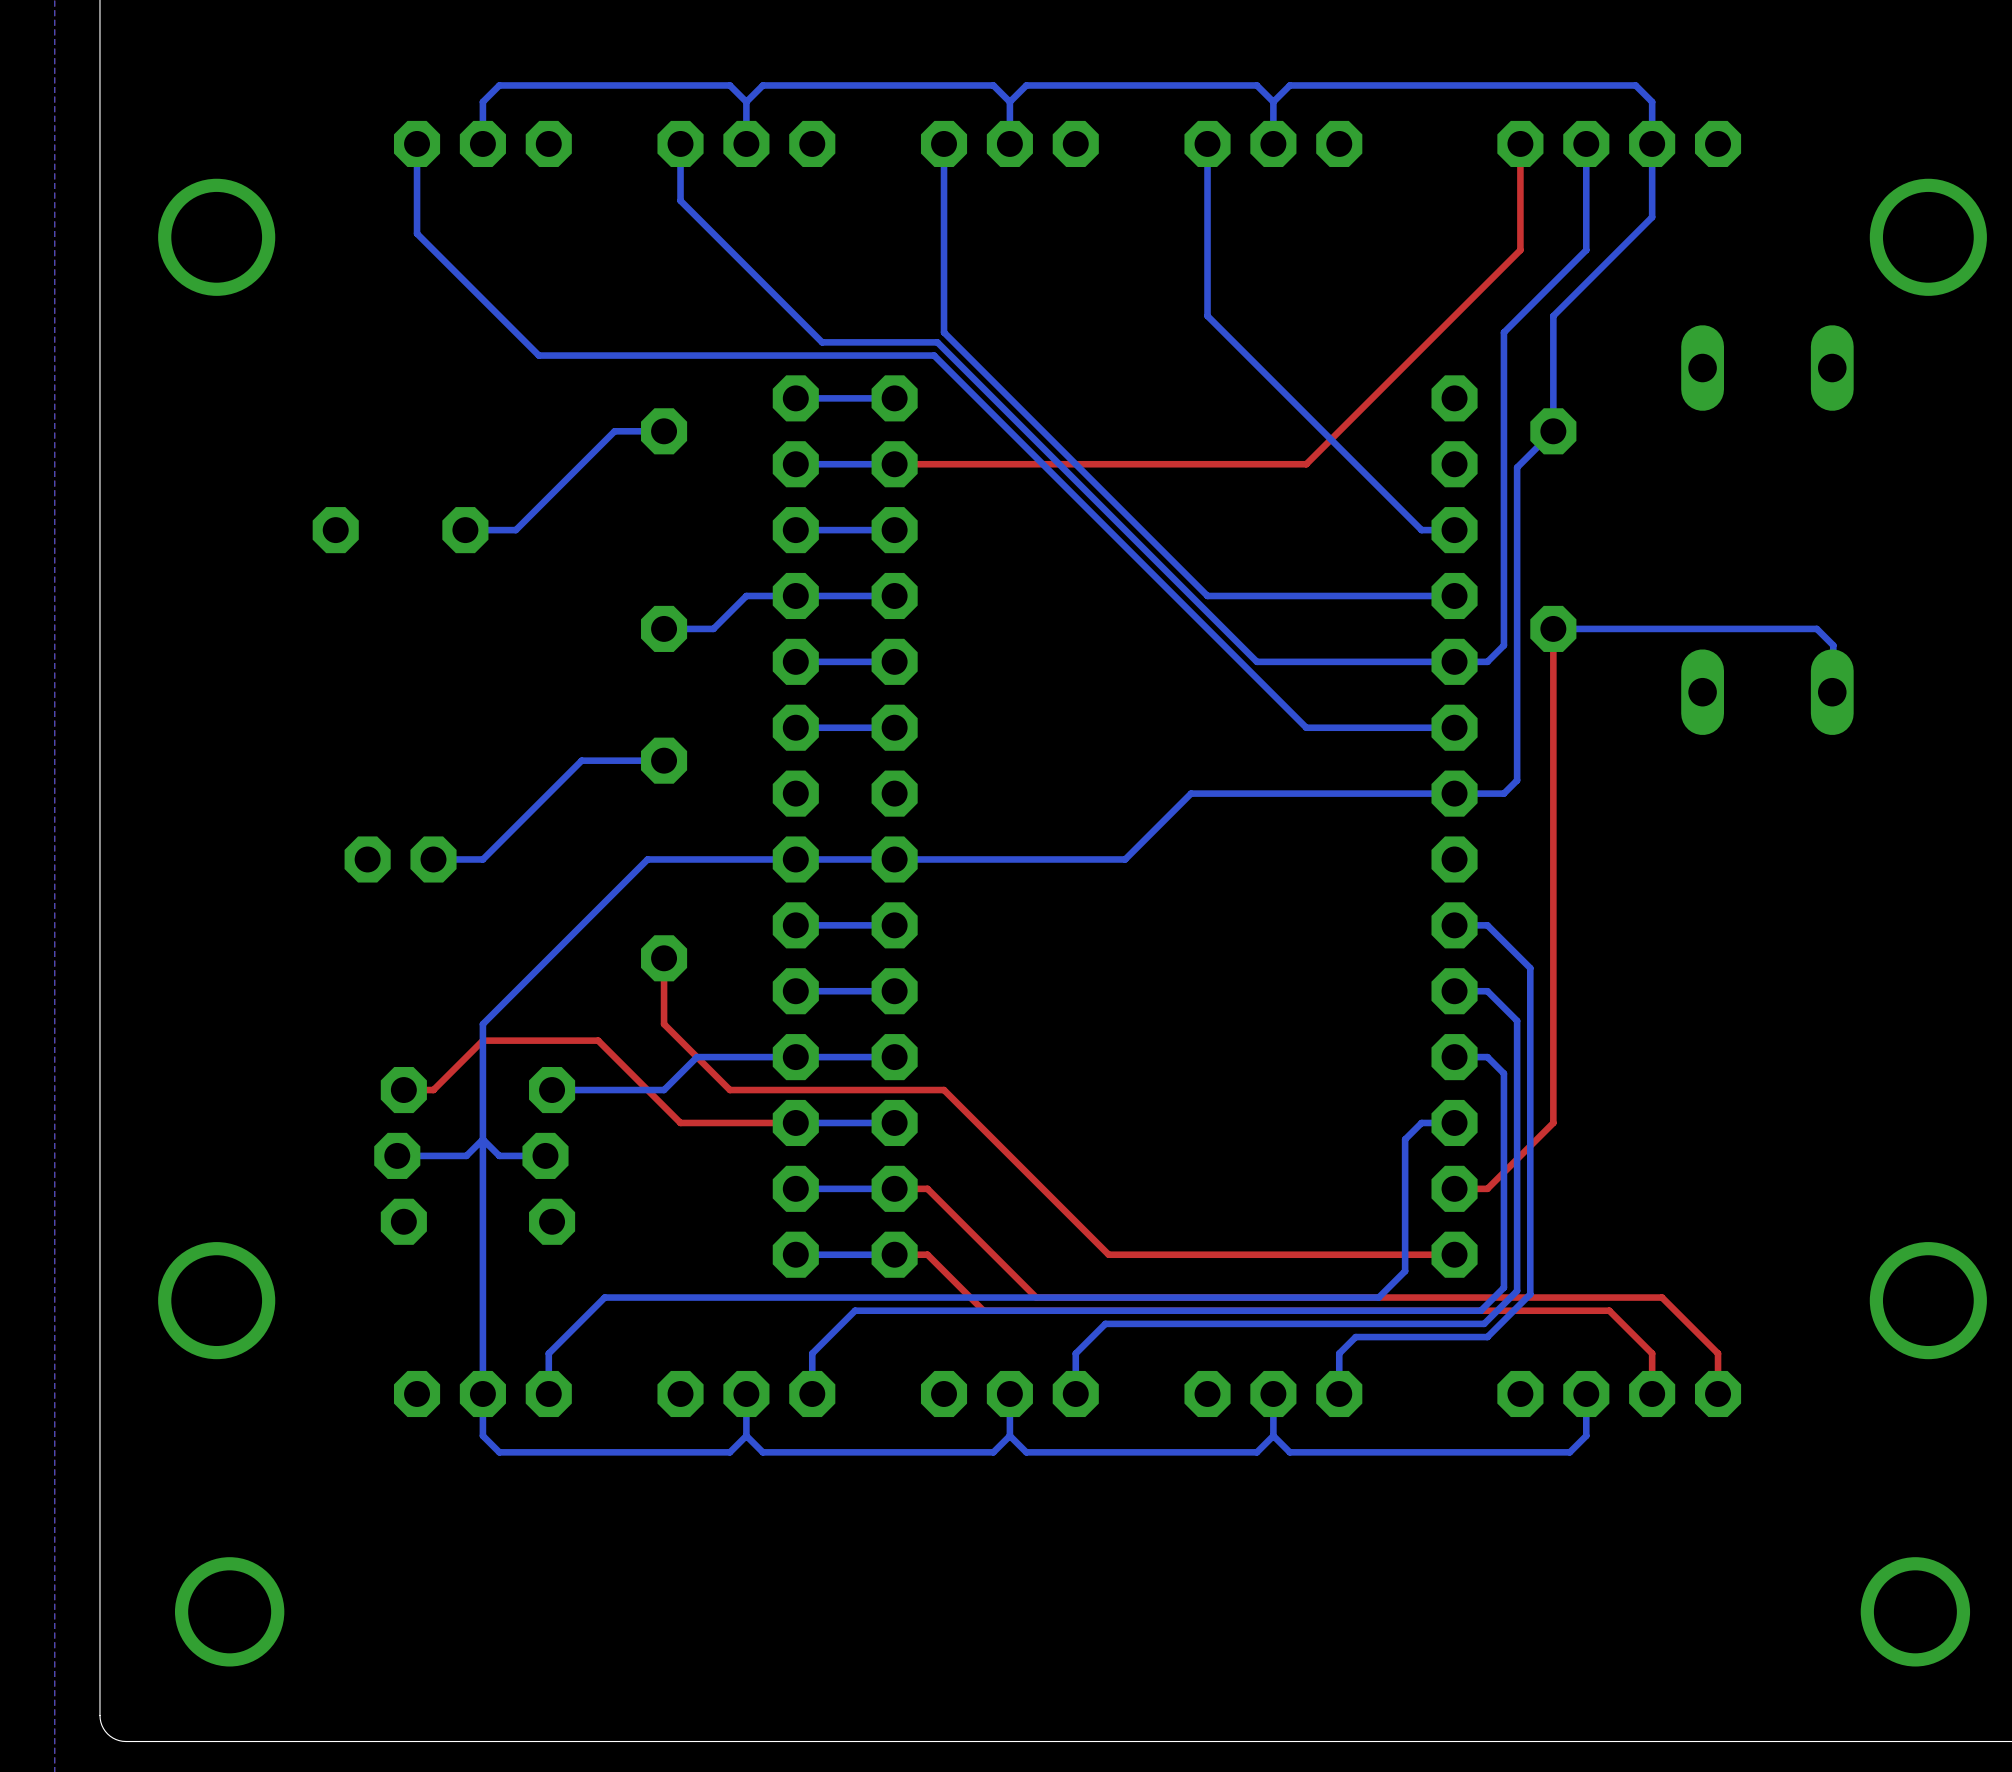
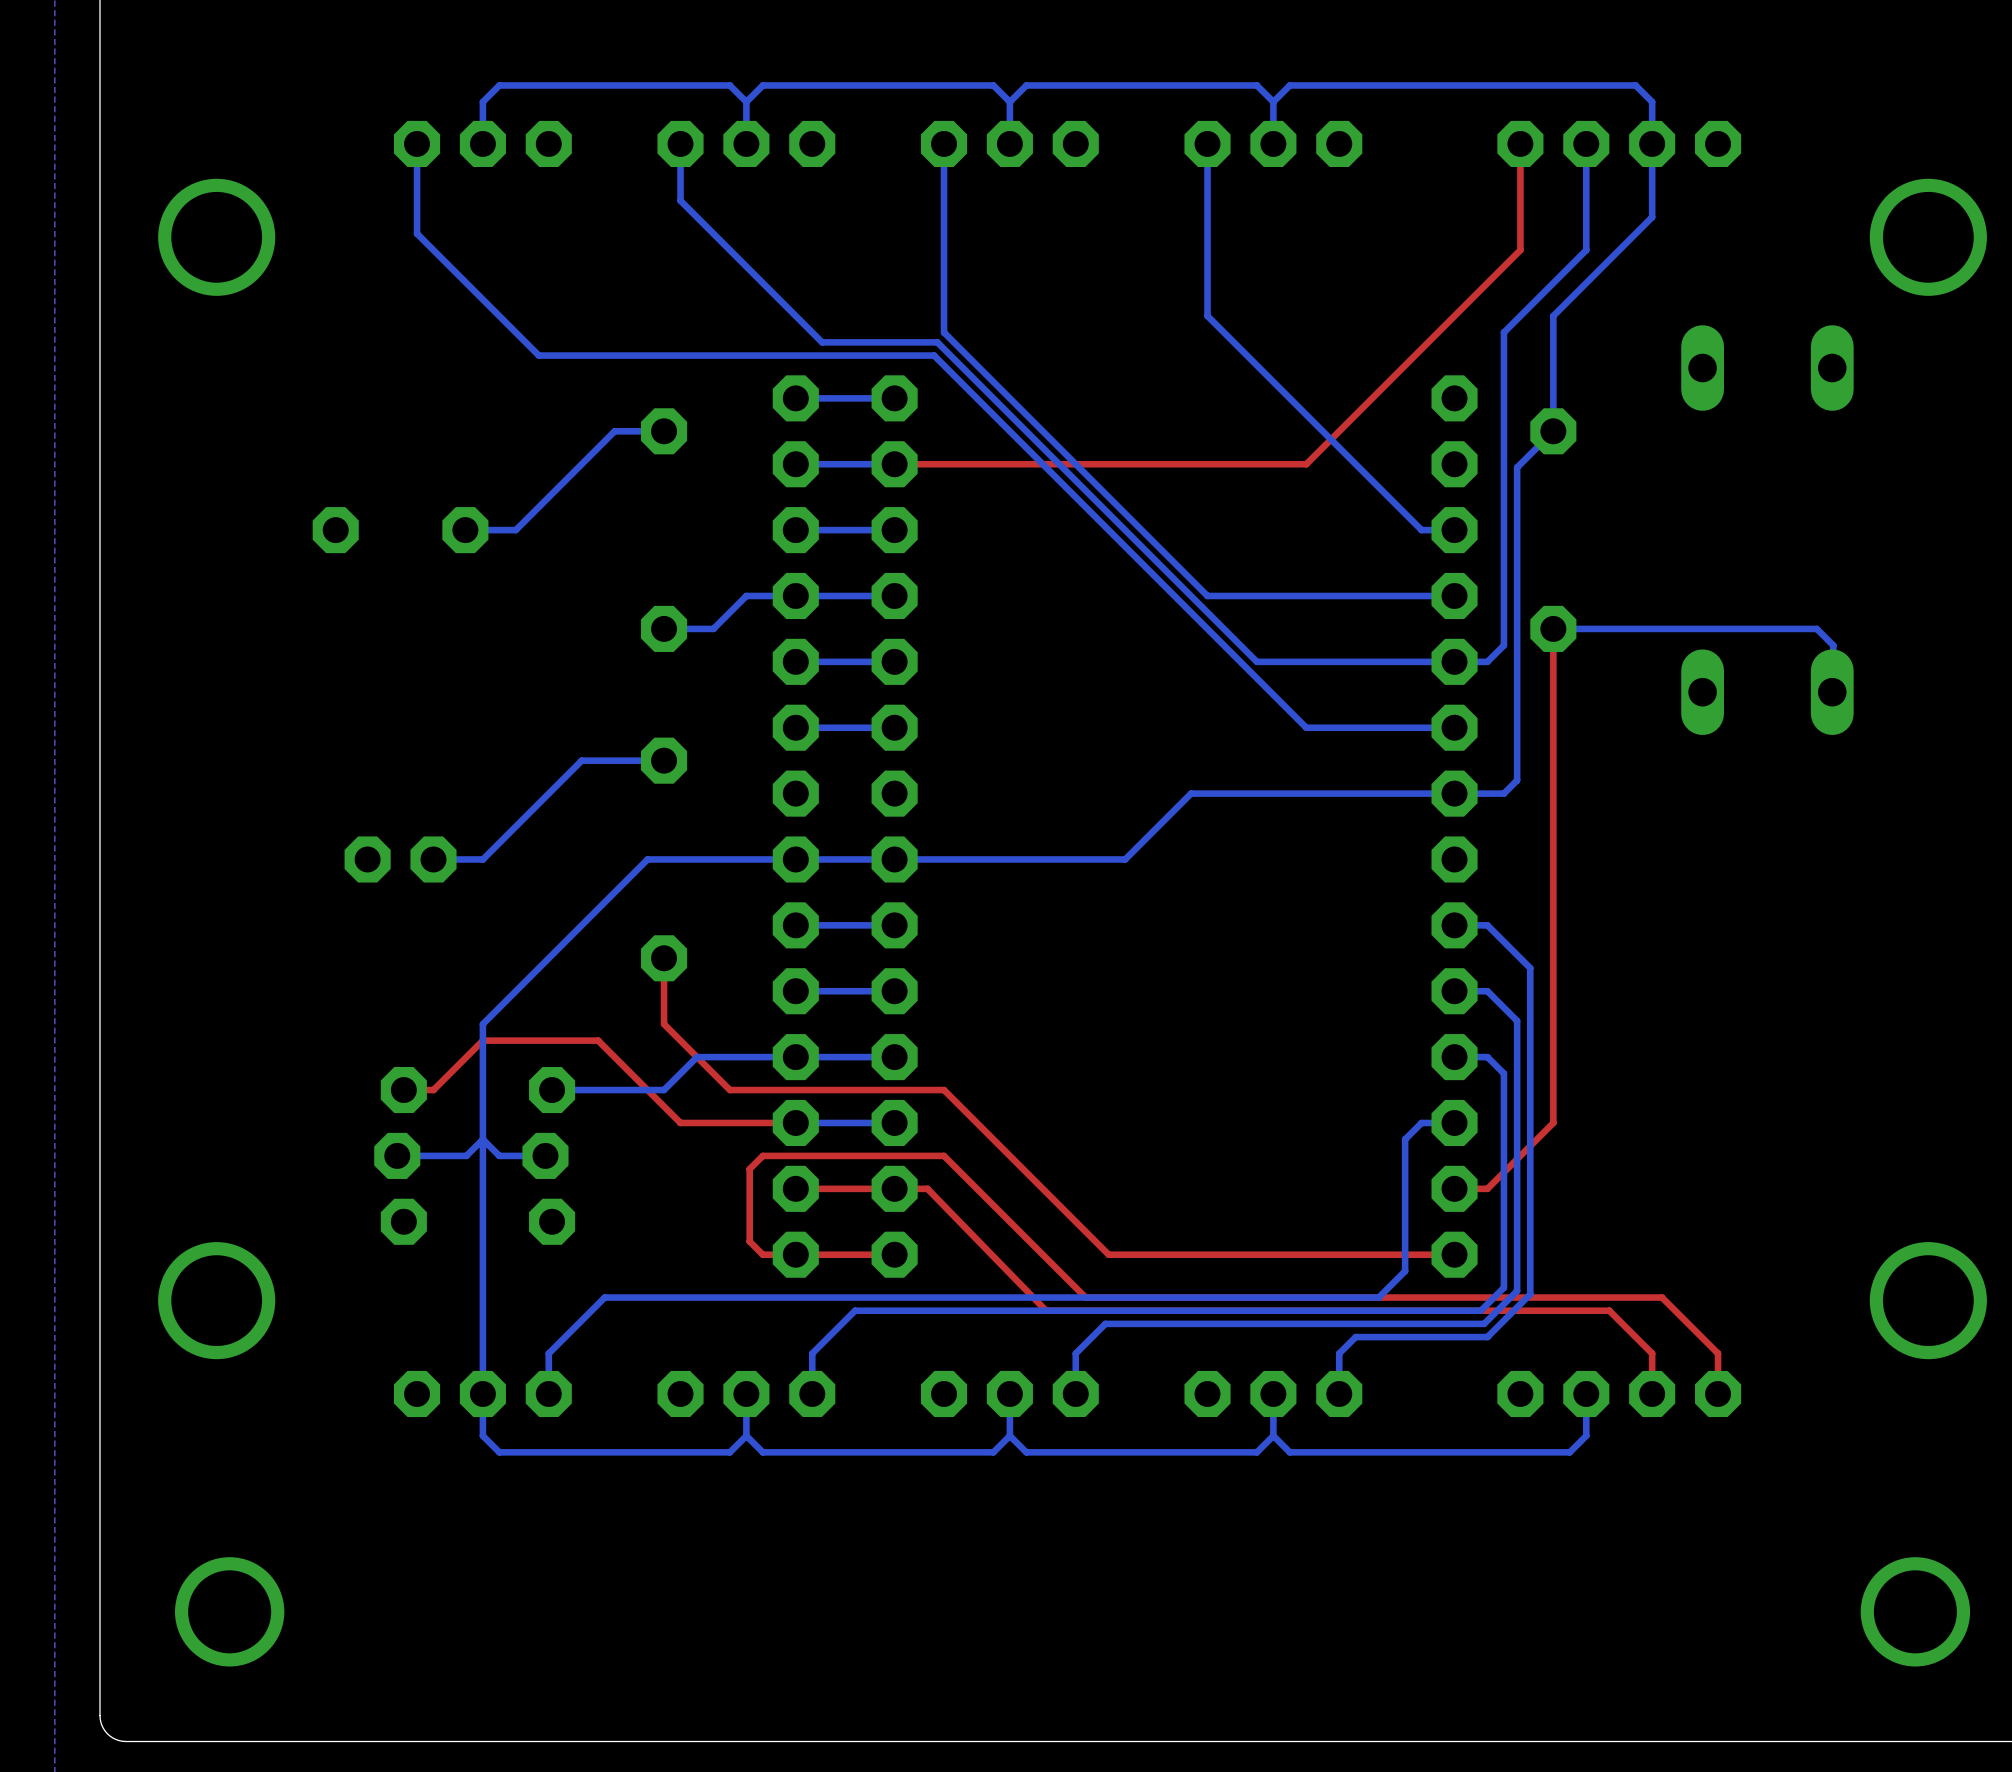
bottom track: (894, 1188) (795, 1188) -> none
top track: none -> (894, 1188) (795, 1188)
top track: (927, 1188) (1036, 1297) (1085, 1297) -> (927, 1188) (1046, 1310)
bottom track: (894, 1254) (795, 1254) -> none
top track: (894, 1254) (927, 1254) (983, 1310) (1046, 1310) -> (894, 1254) (762, 1254) (749, 1241) (749, 1169) (762, 1155) (944, 1155) (1085, 1297)

